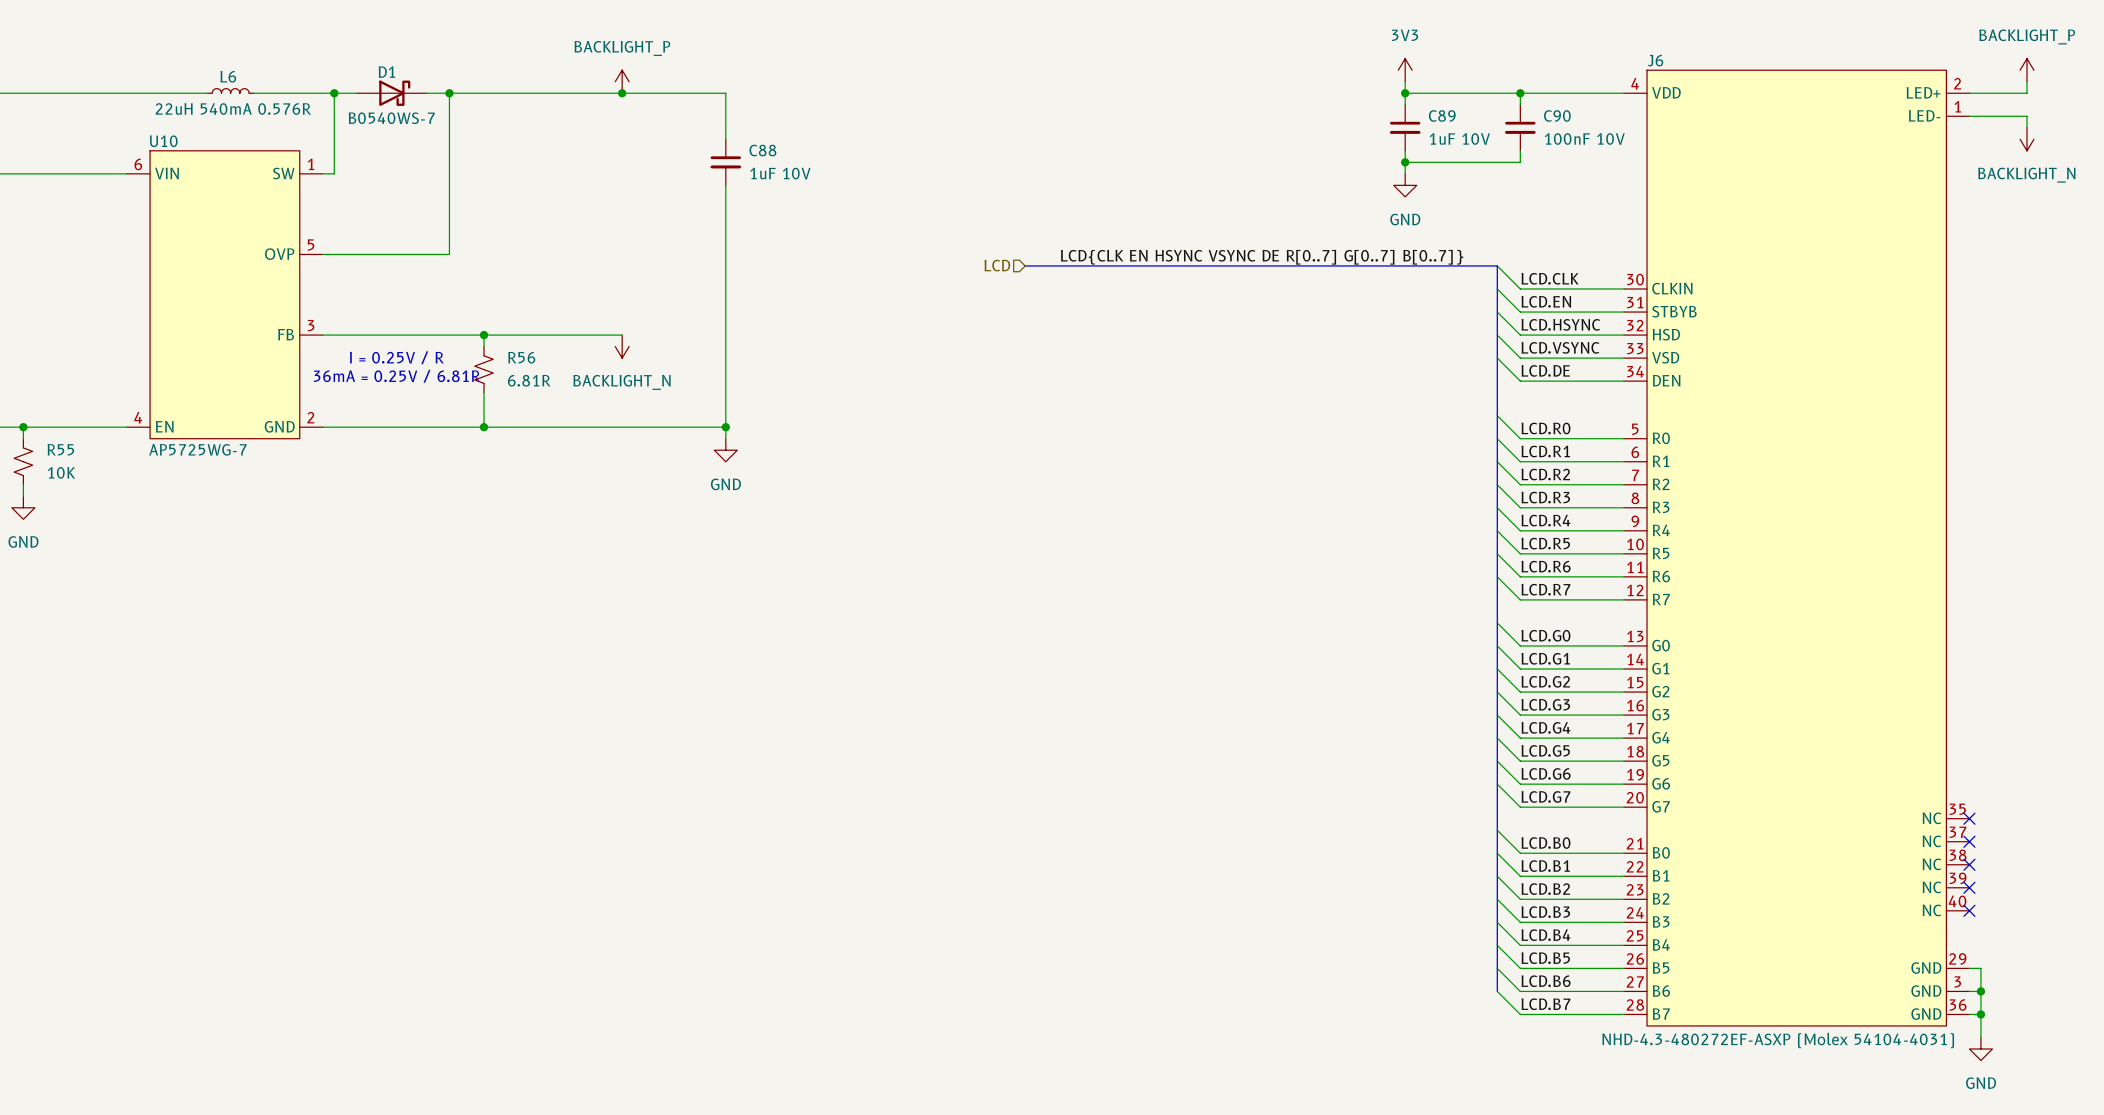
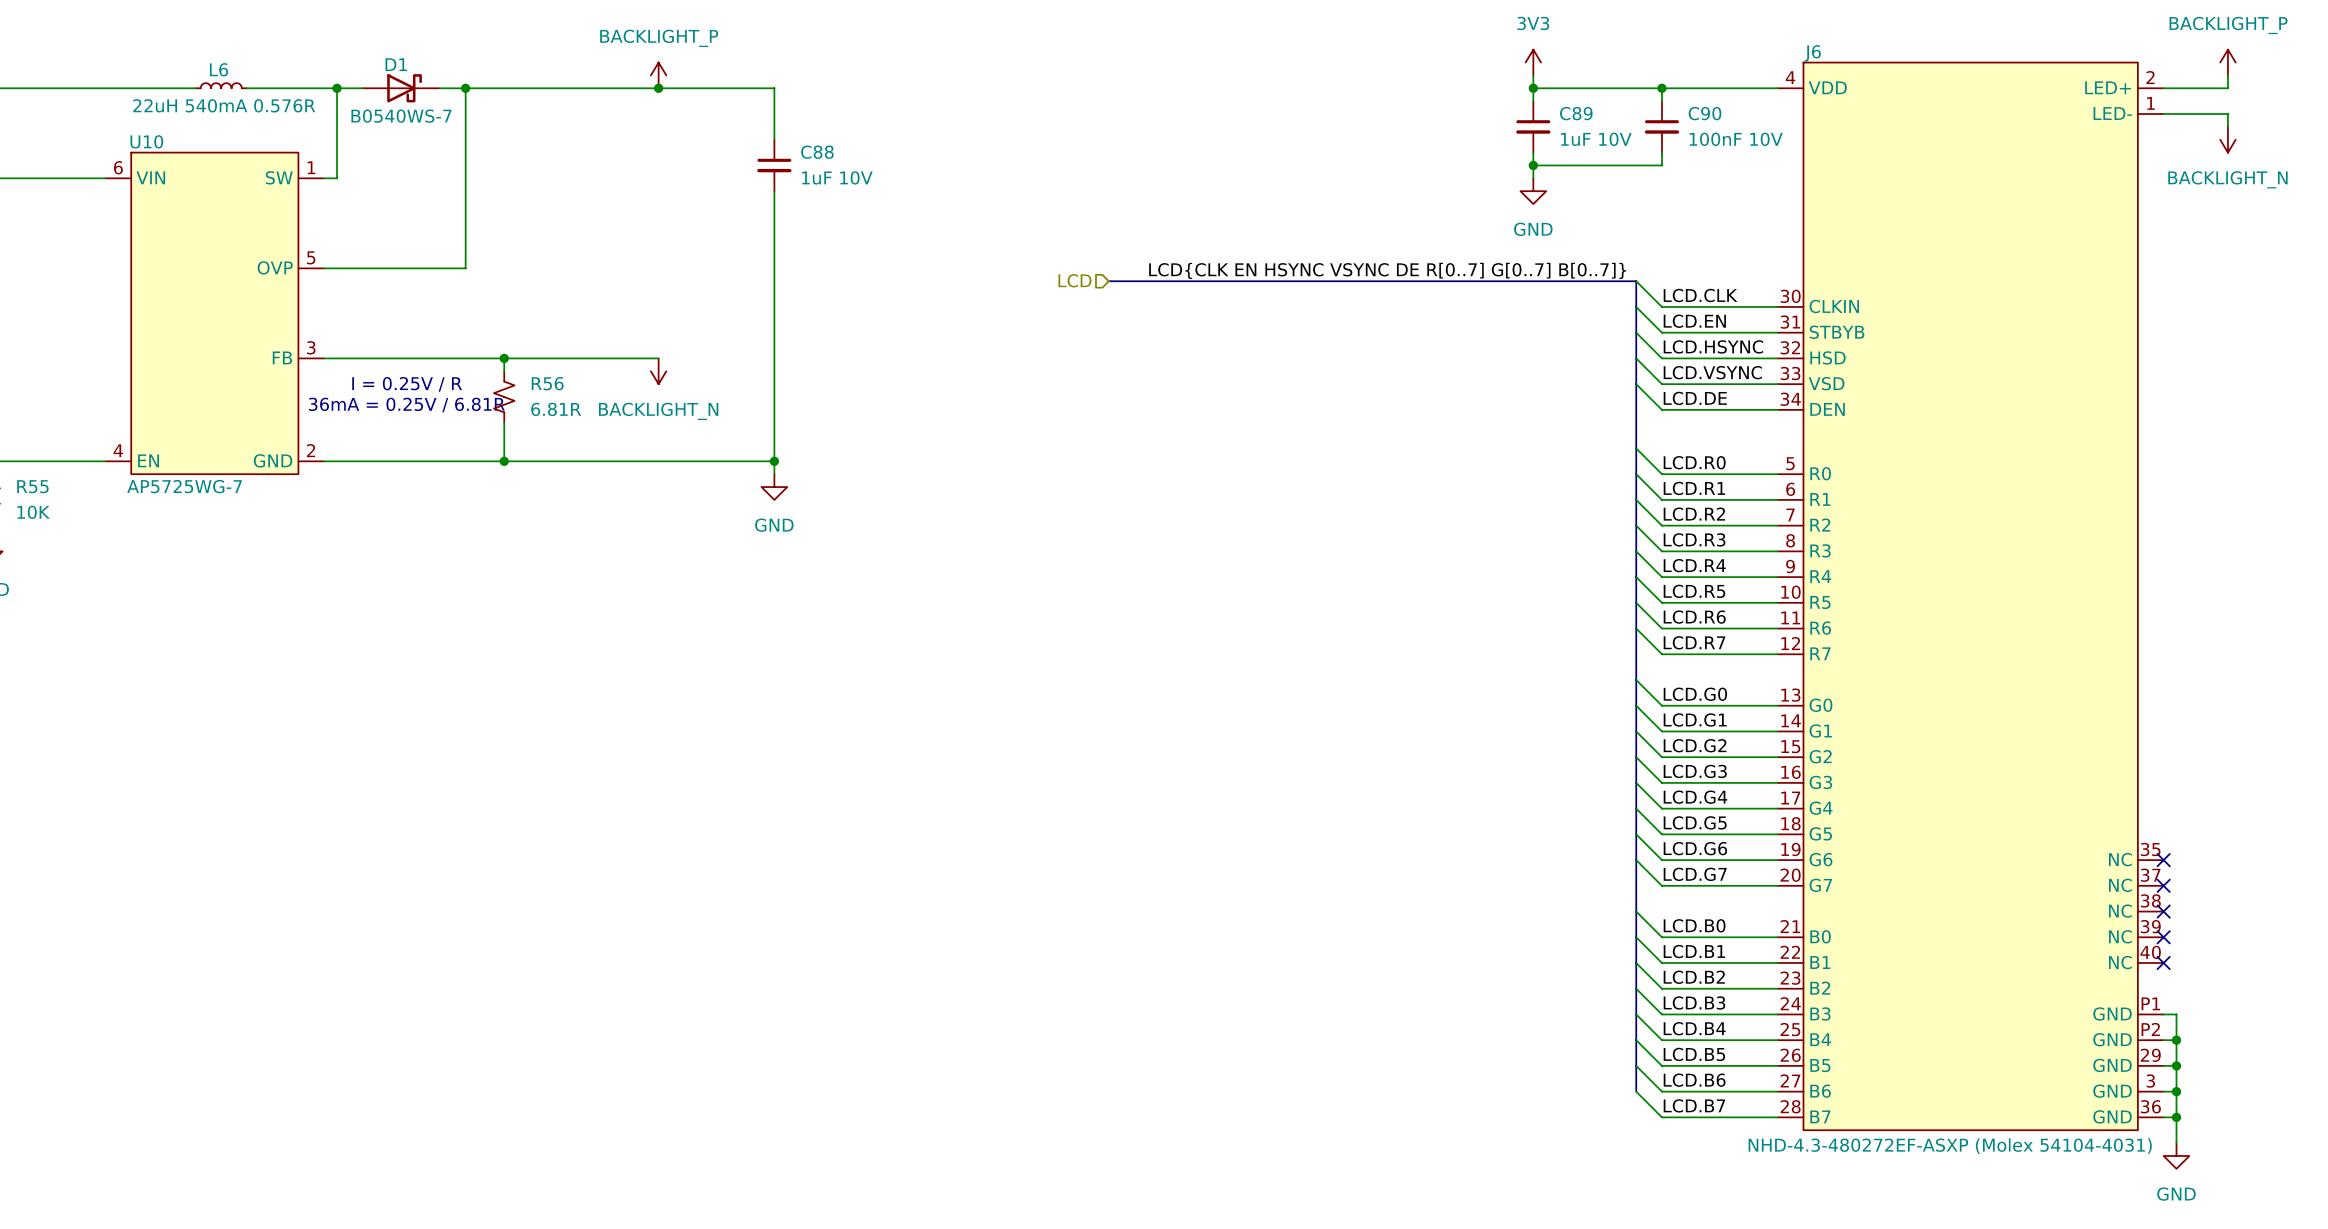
J6 symbol: [1623, 70, 1970, 1026] -> [1777, 62, 2164, 1131]
no-connect mark: none -> (2163, 860)
no-connect mark: none -> (2163, 885)
no-connect mark: (1969, 818) -> none
no-connect mark: none -> (2163, 911)
no-connect mark: (1969, 841) -> none
no-connect mark: none -> (2163, 937)
no-connect mark: (1969, 864) -> none
no-connect mark: none -> (2163, 963)
no-connect mark: (1969, 887) -> none
no-connect mark: (1969, 910) -> none
wire: none -> (2163, 1014) (2176, 1014) (2176, 1065)
wire: none -> (2163, 1040) (2176, 1040)
junction: none -> (2176, 1040)
junction: none -> (2176, 1065)

